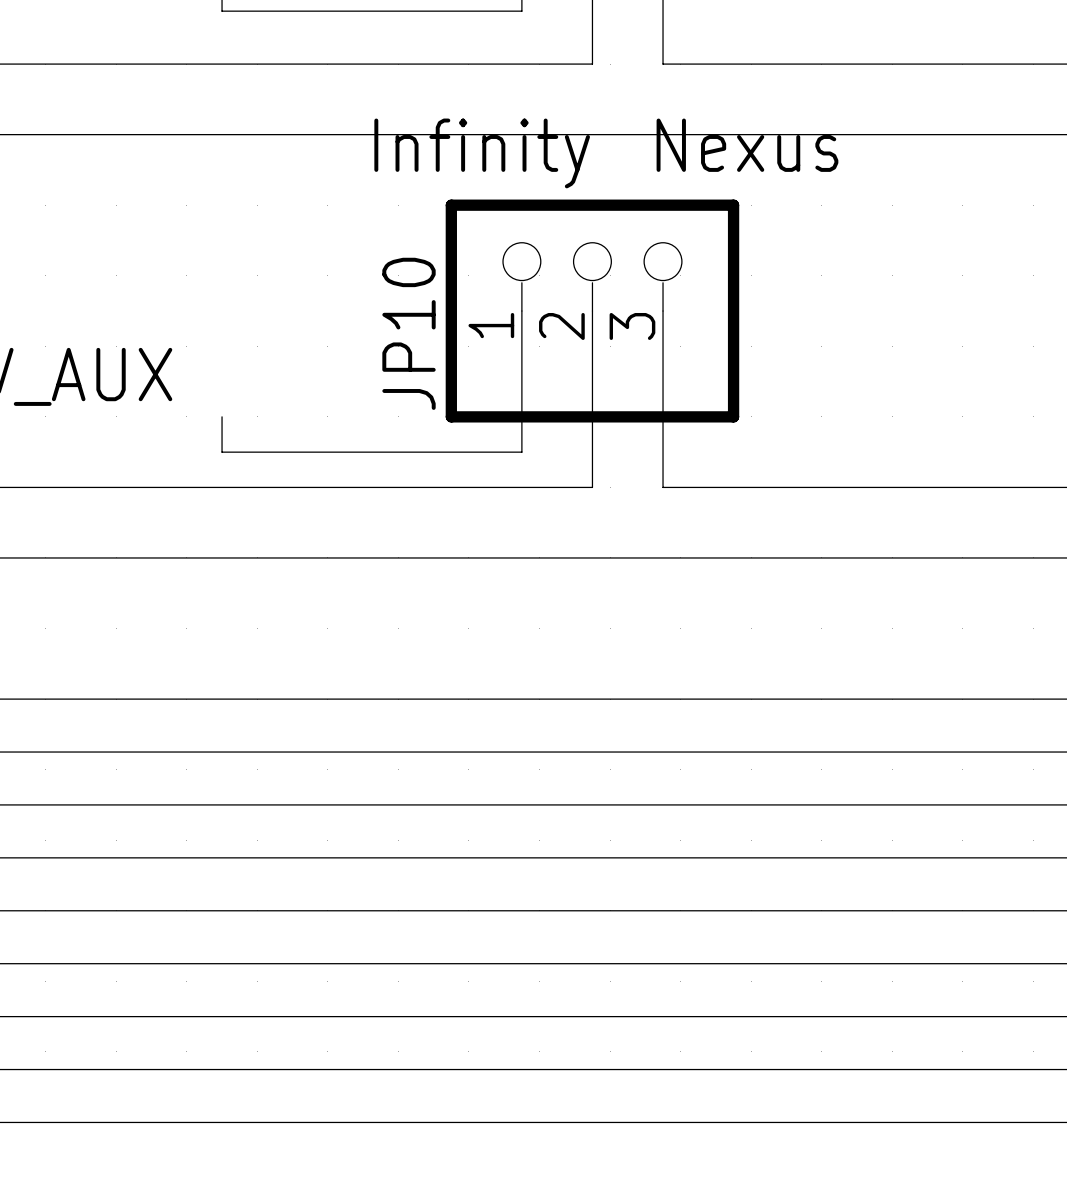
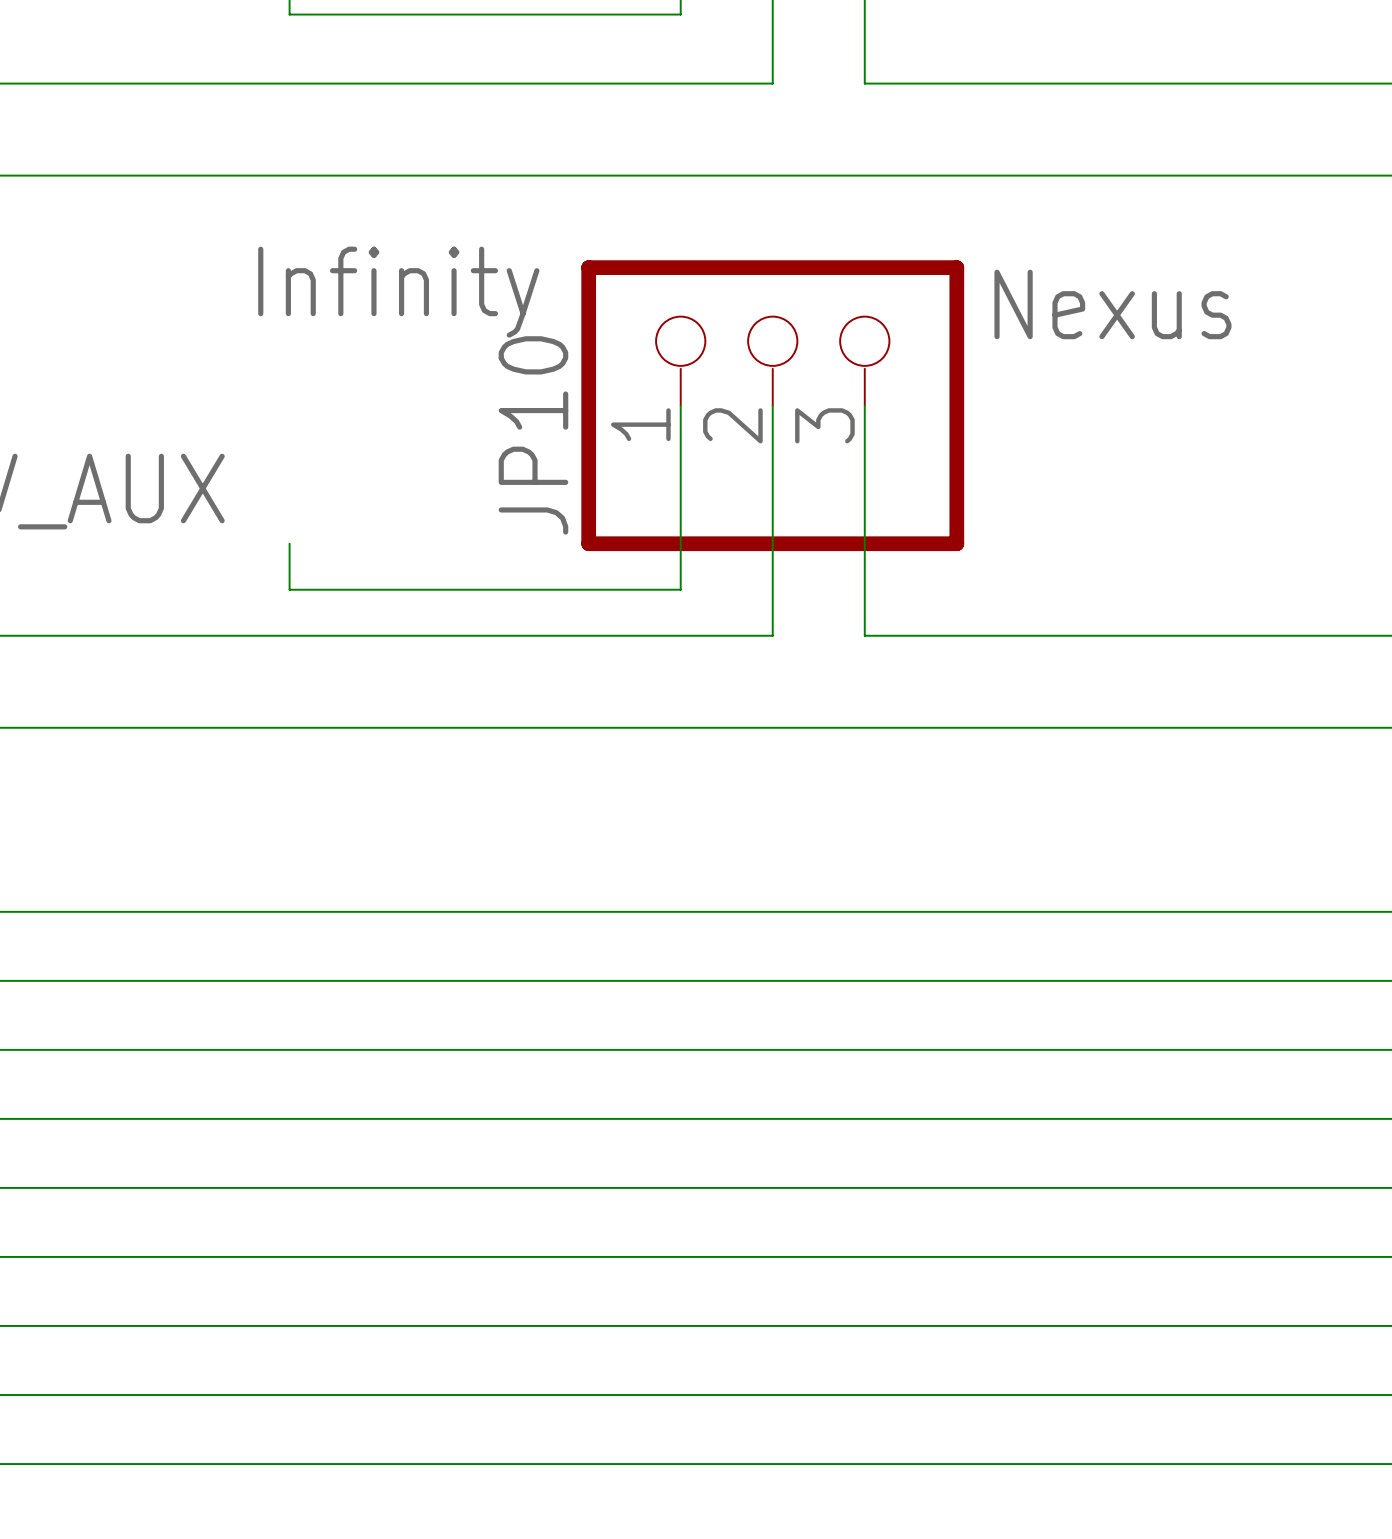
text position: Nexus (747, 145) -> Nexus (1112, 304)
text position: Infinity (482, 153) -> Infinity (398, 292)

